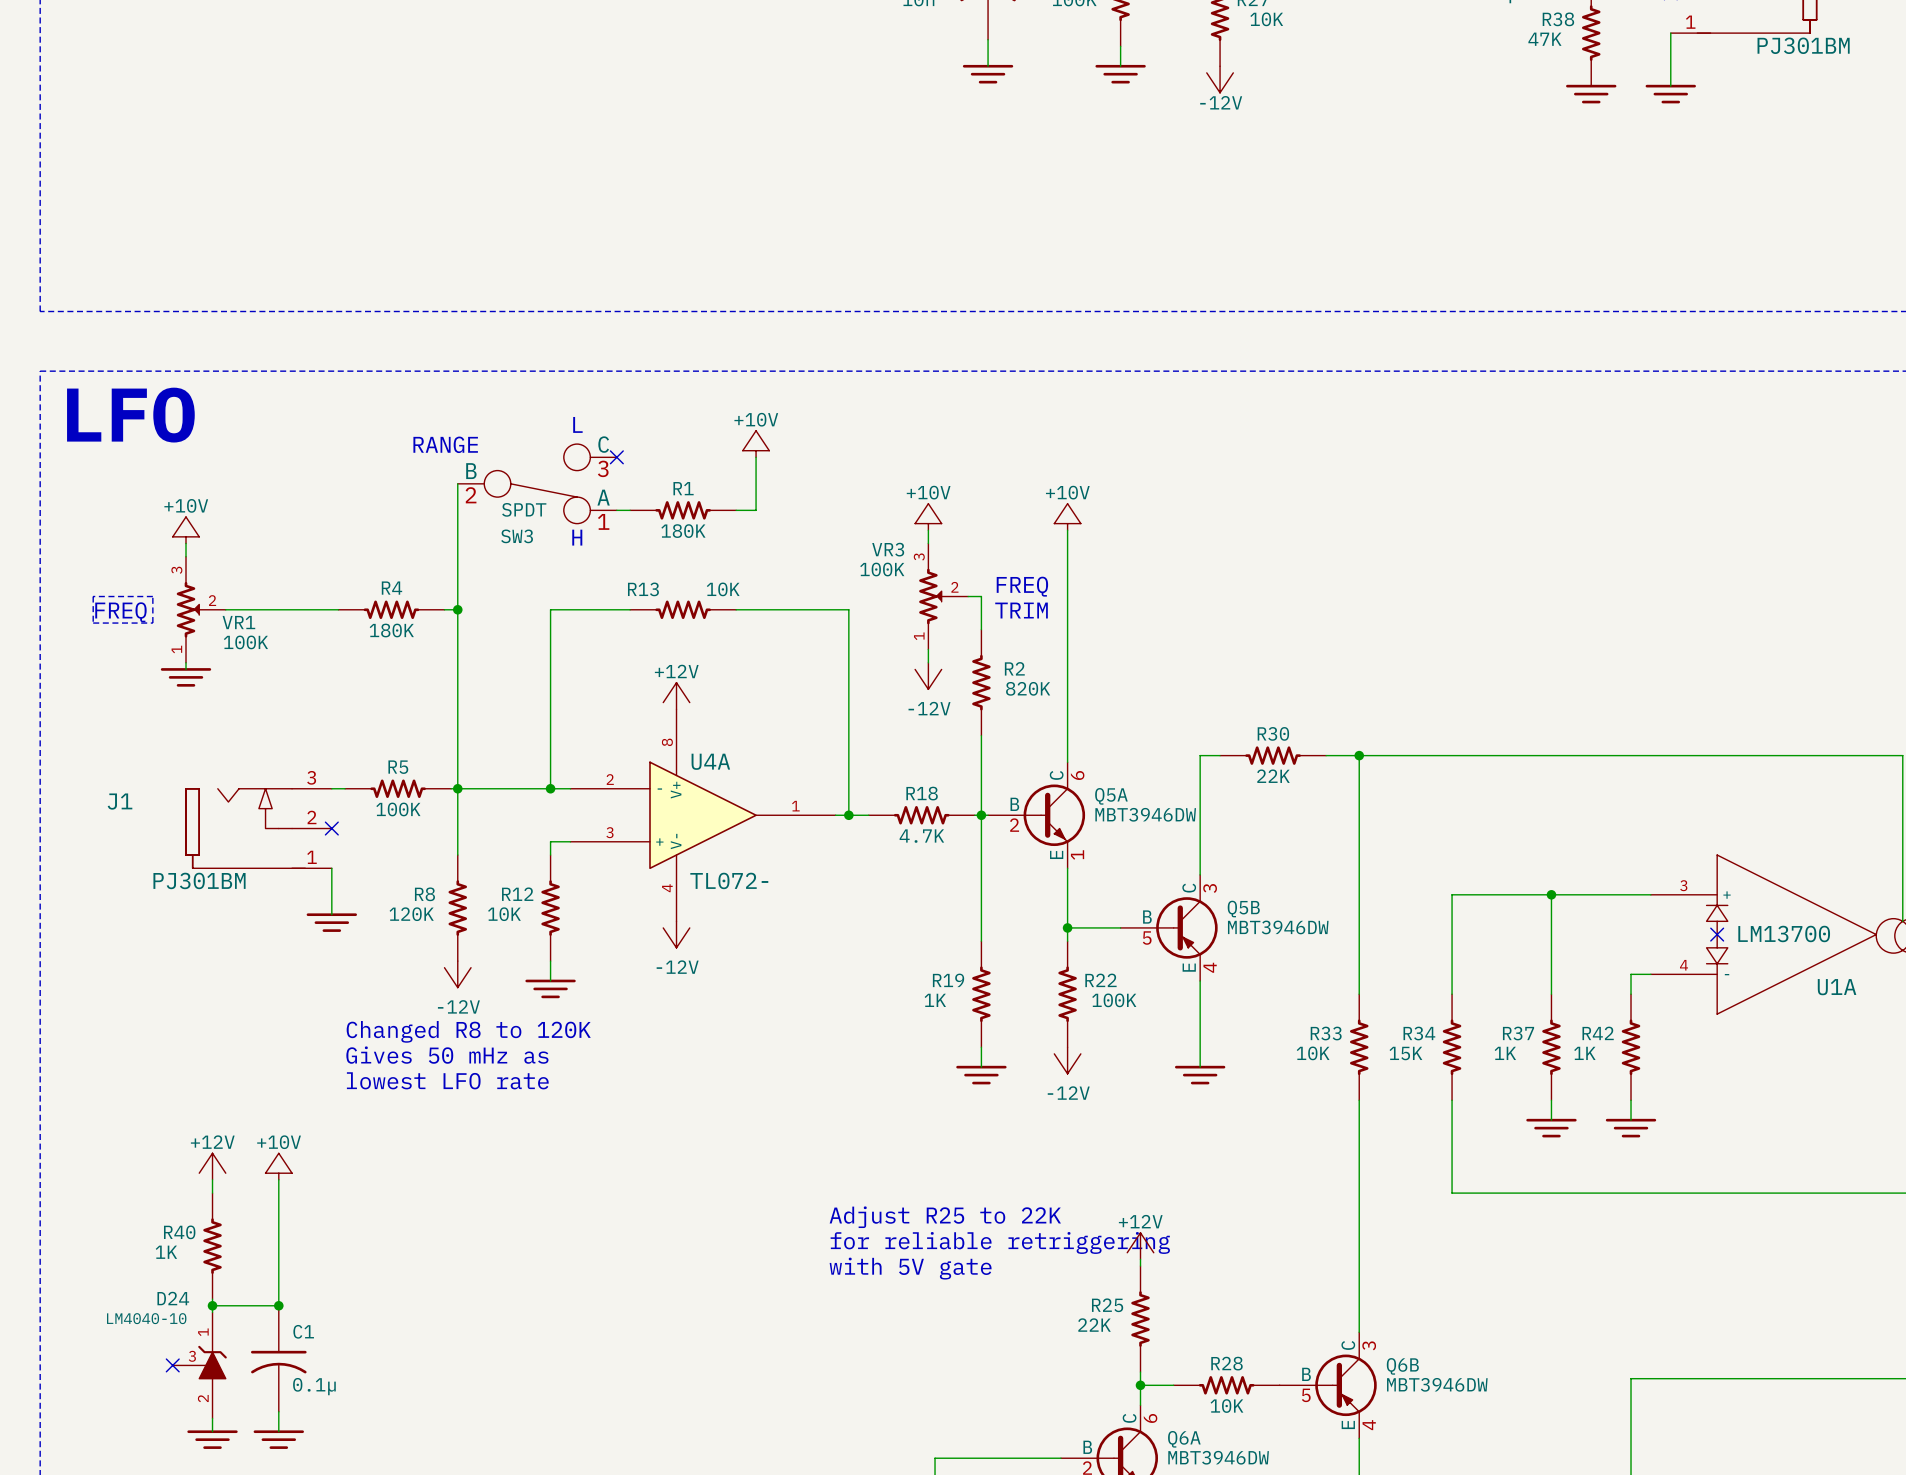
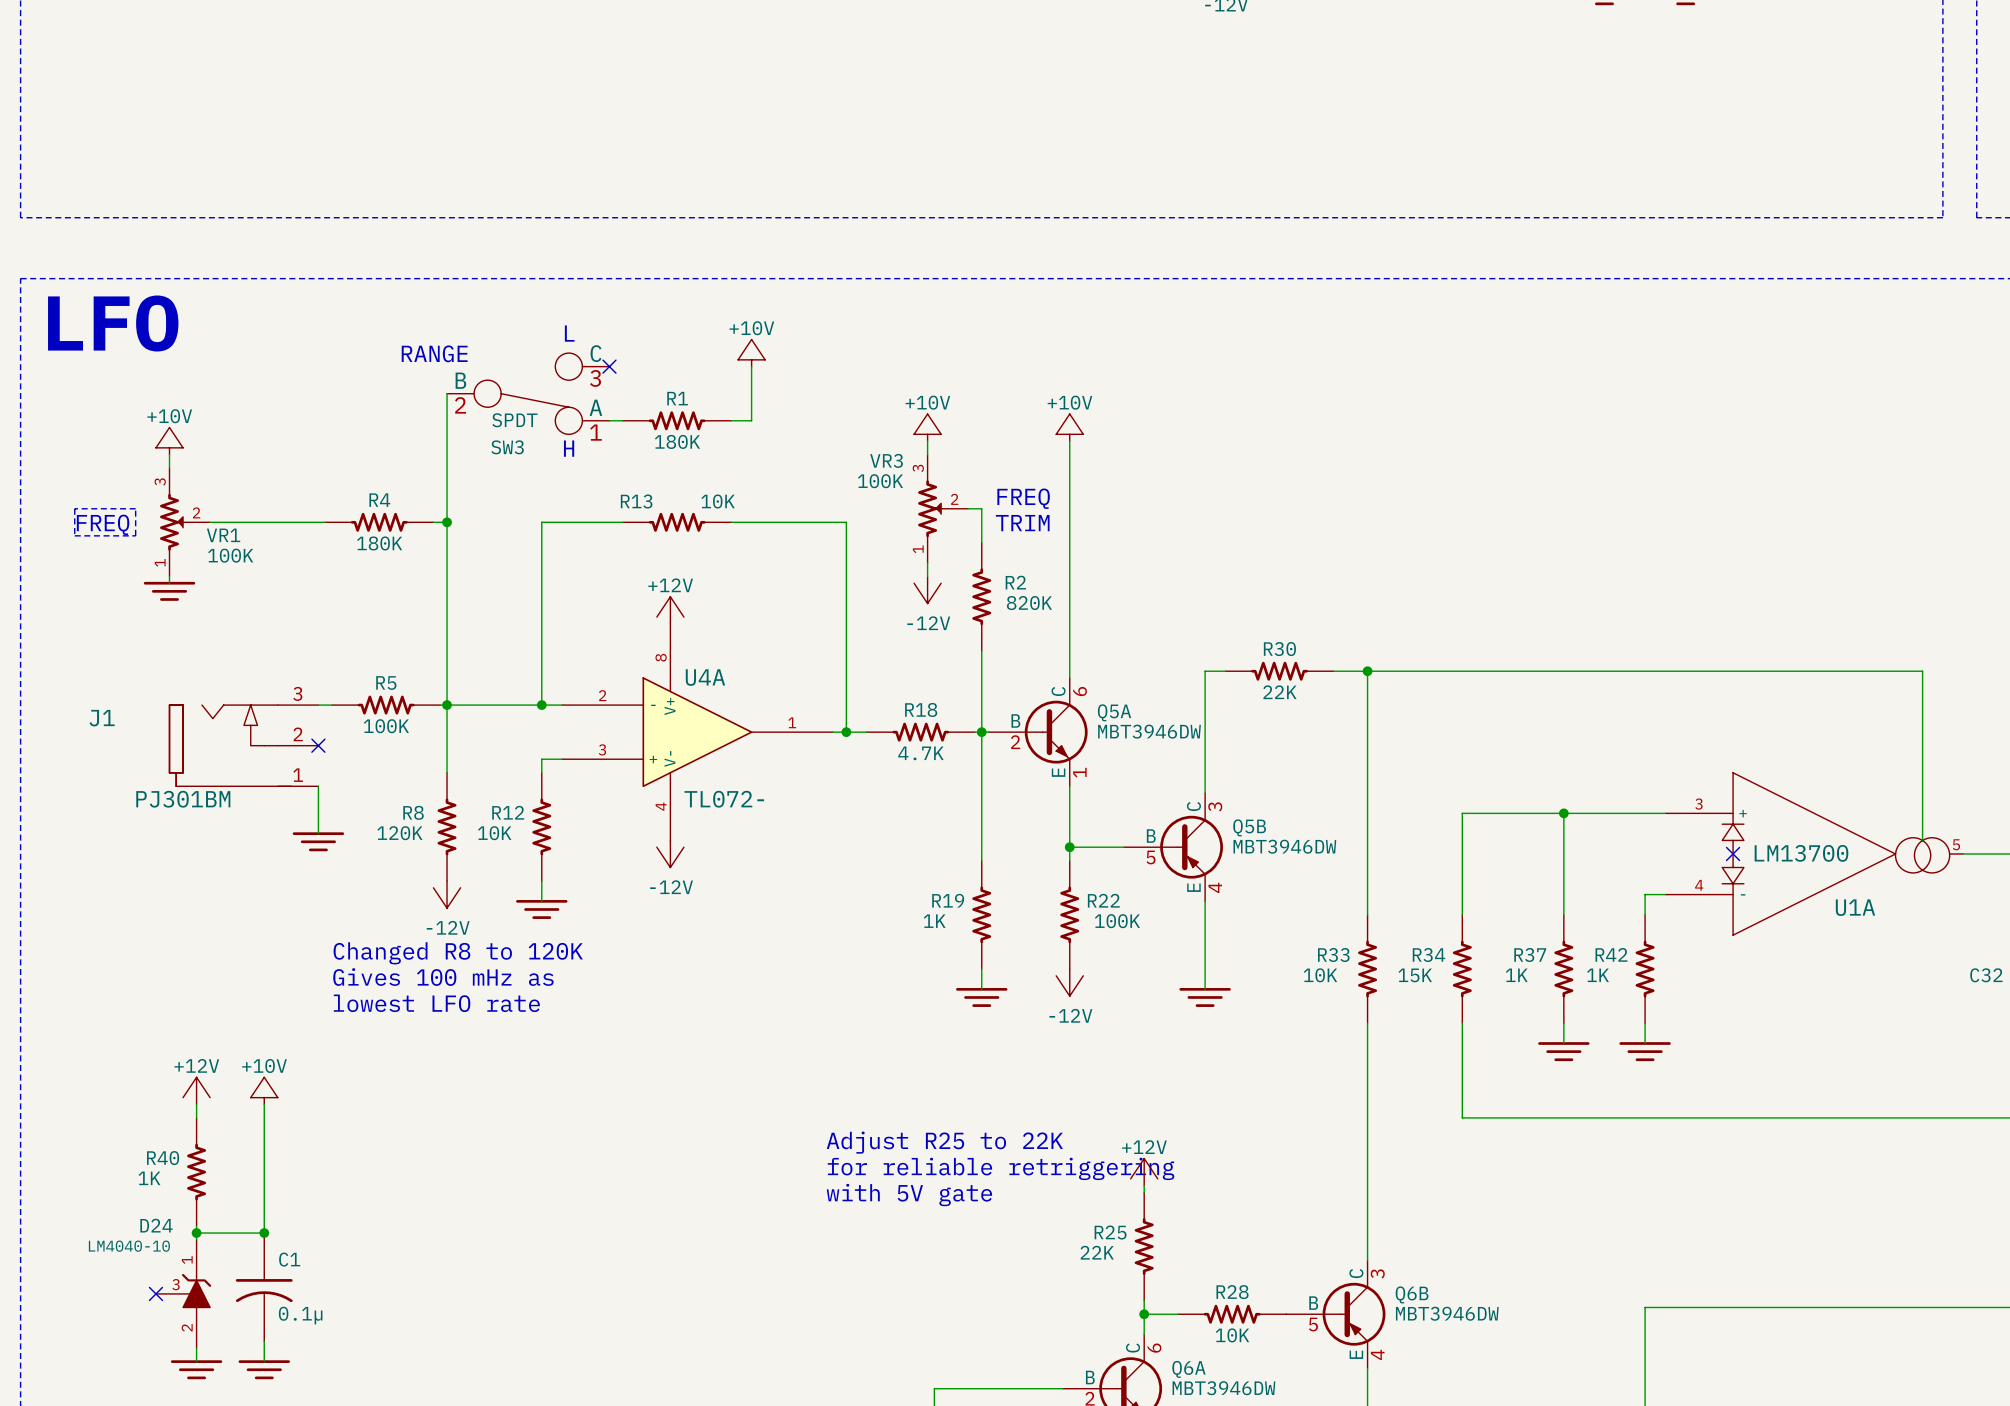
text: Gives 50 mHz as (447, 1055) -> Gives 100 mHz as (443, 977)

